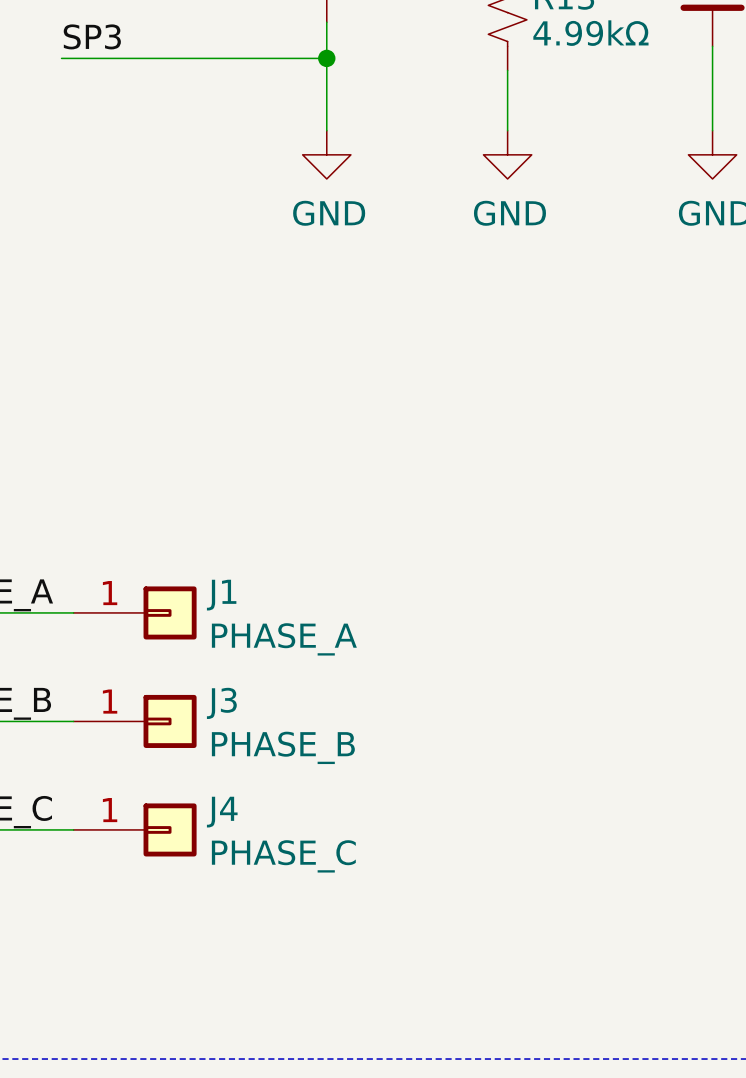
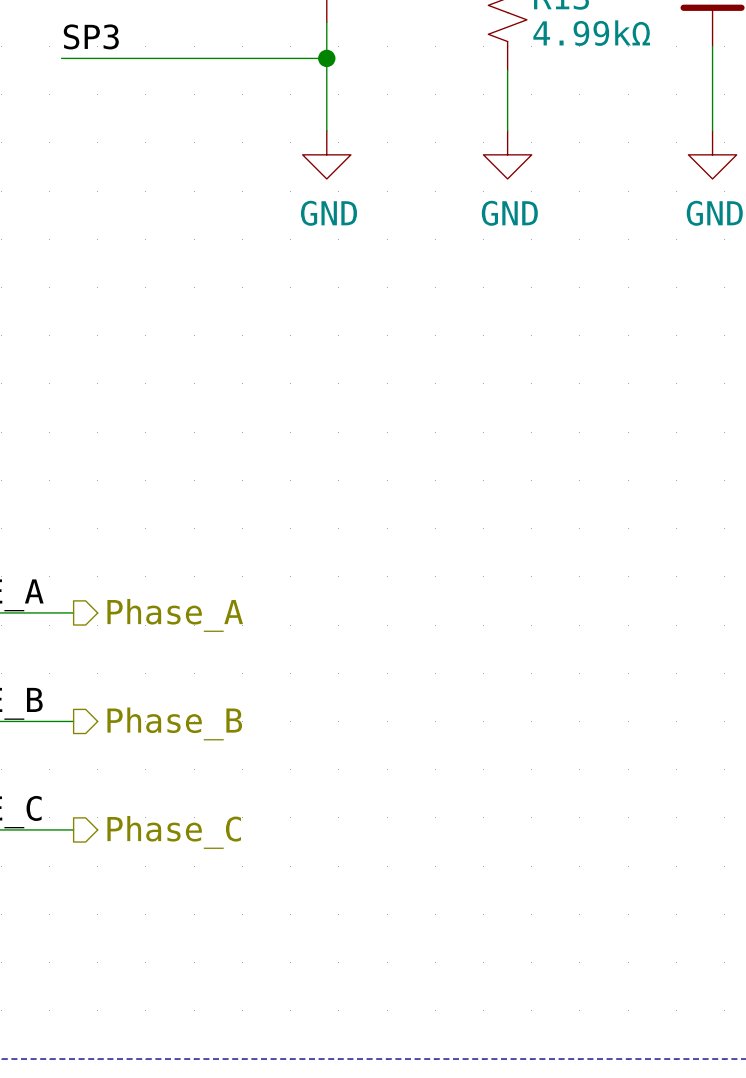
J1: PHASE_A (135, 612) -> none
hierarchical label: none -> Phase_A (175, 615)
J3: PHASE_B (135, 721) -> none
hierarchical label: none -> Phase_B (174, 723)
J4: PHASE_C (135, 829) -> none
hierarchical label: none -> Phase_C (174, 832)

